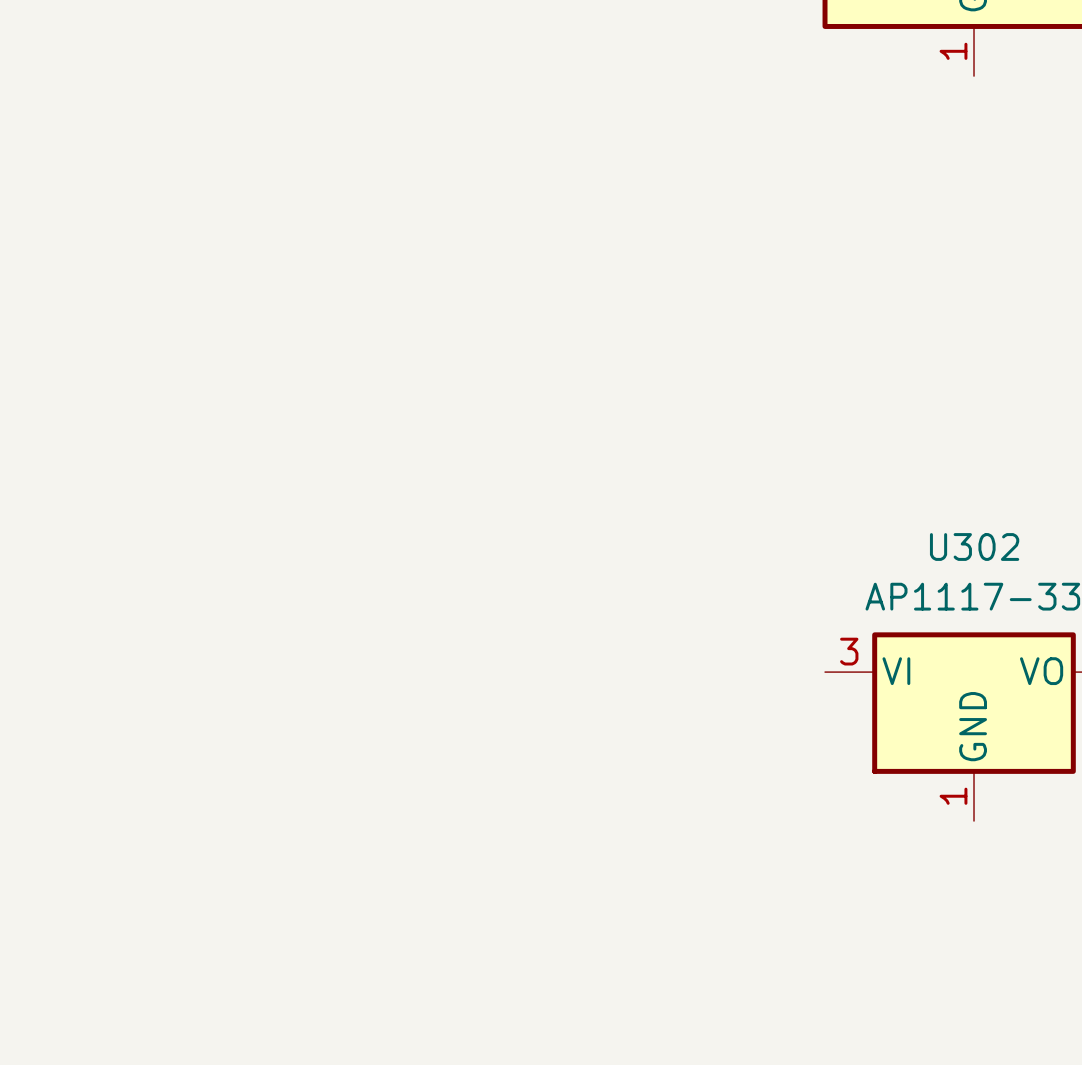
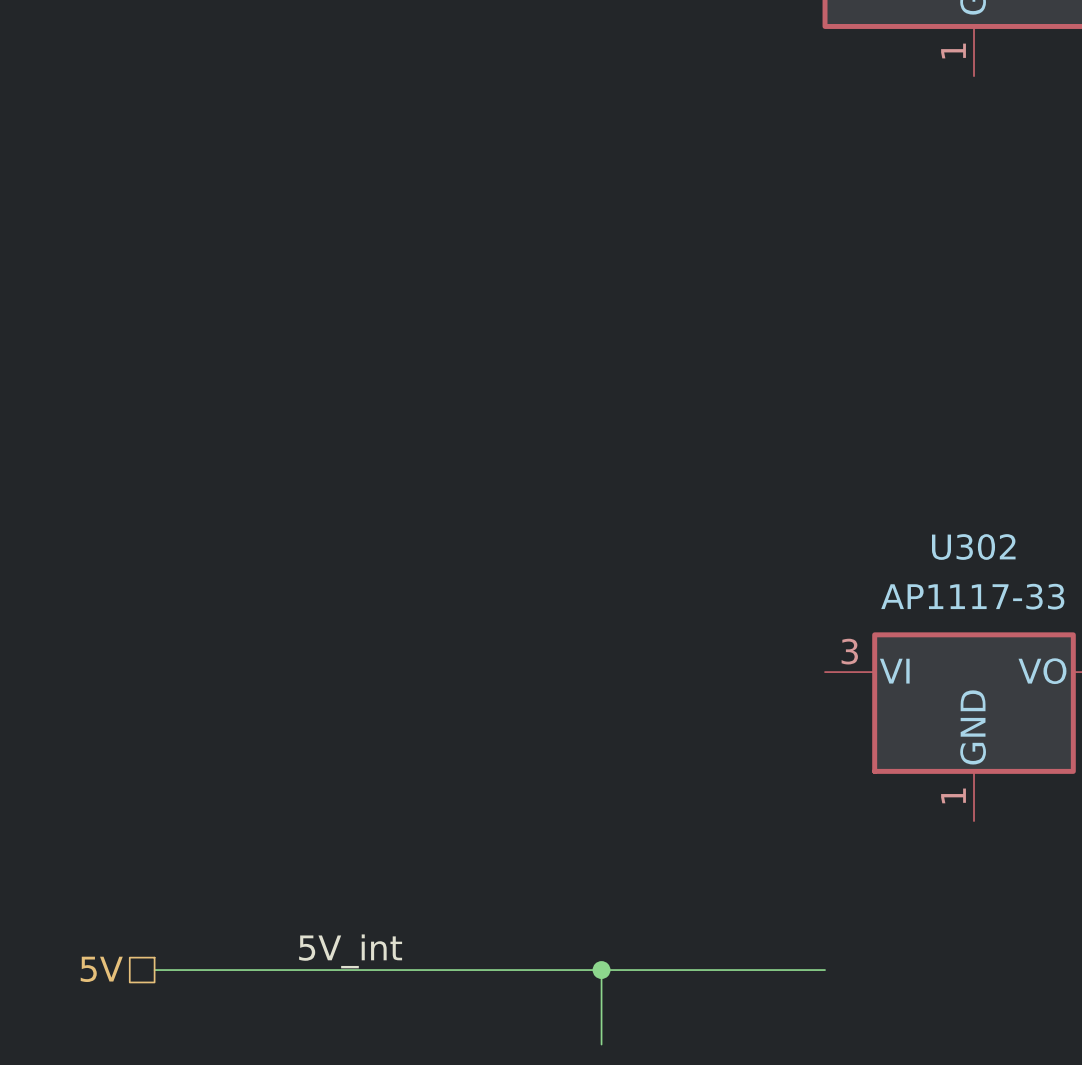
label: none -> 5V_int (350, 951)
hierarchical label: none -> 5V (101, 969)
wire: none -> (154, 970) (825, 970)
wire: none -> (601, 970) (601, 1044)
junction: none -> (601, 970)

